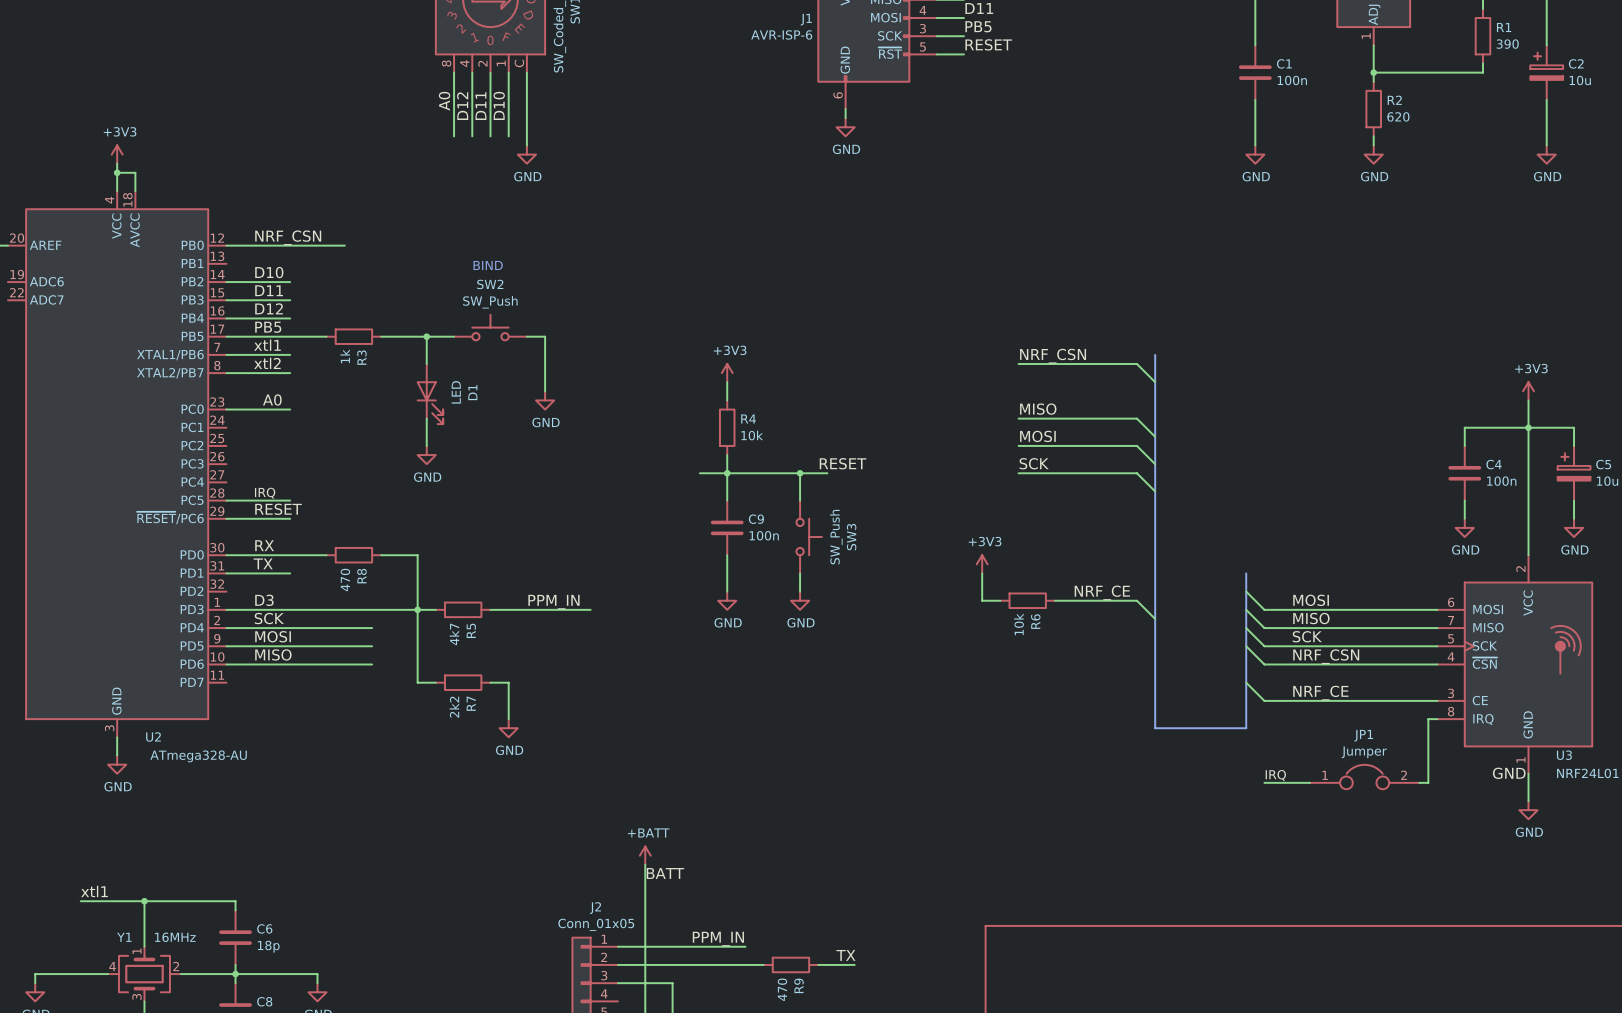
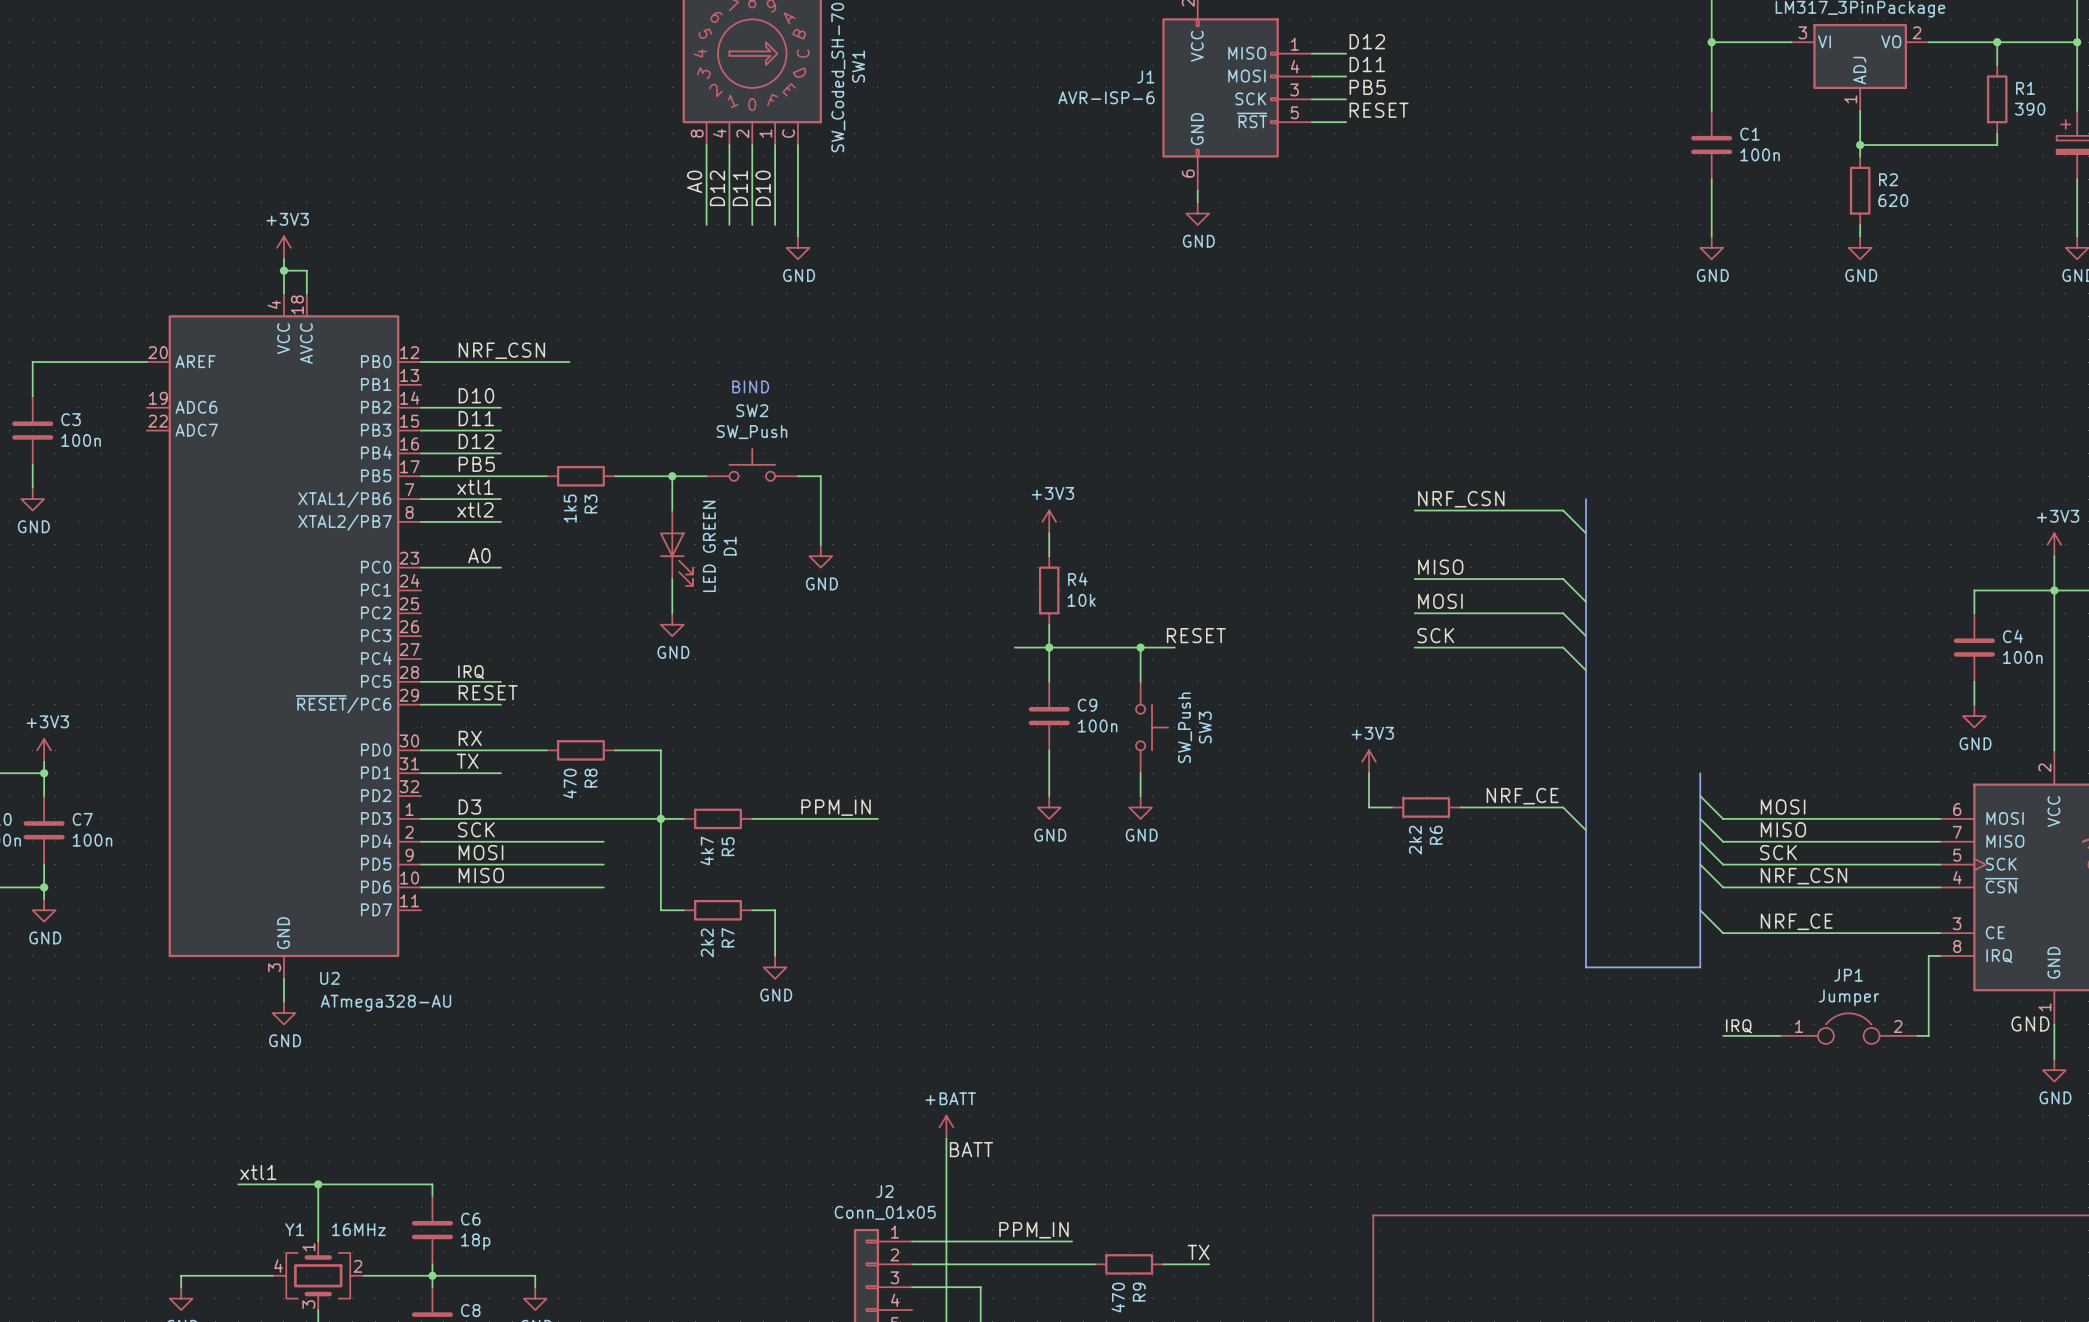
R3 value: 1k (345, 356) -> 1k5 (570, 508)
D1 value: LED (456, 392) -> LED GREEN (709, 546)
R6 value: 10k (1019, 624) -> 2k2 (1415, 840)

